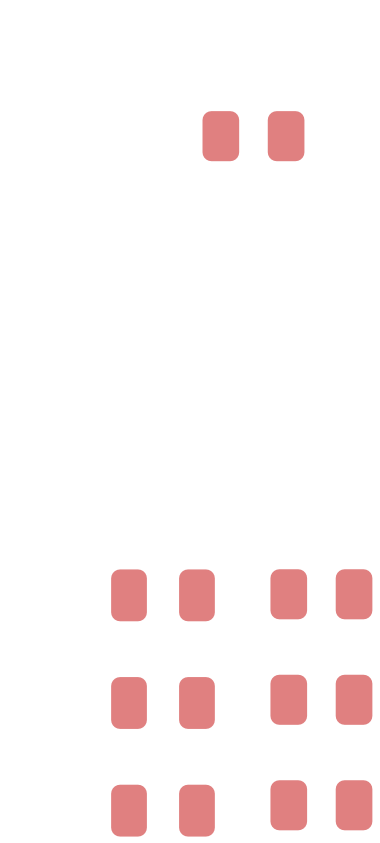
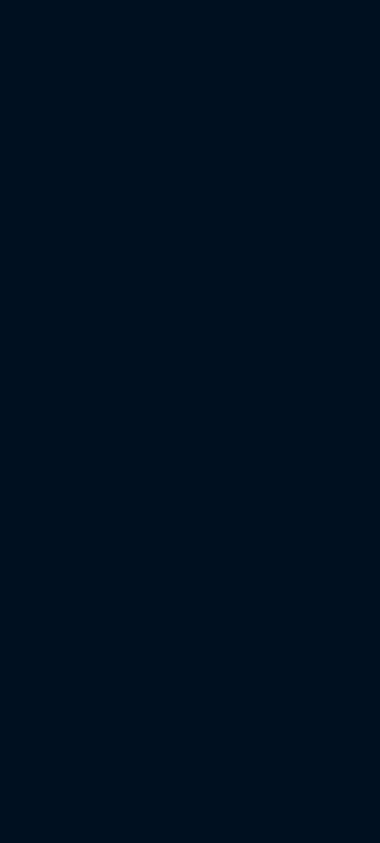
part: (253, 136) -> none
part: (321, 594) -> none
part: (162, 595) -> none
part: (321, 699) -> none
part: (162, 702) -> none
part: (321, 805) -> none
part: (162, 810) -> none

